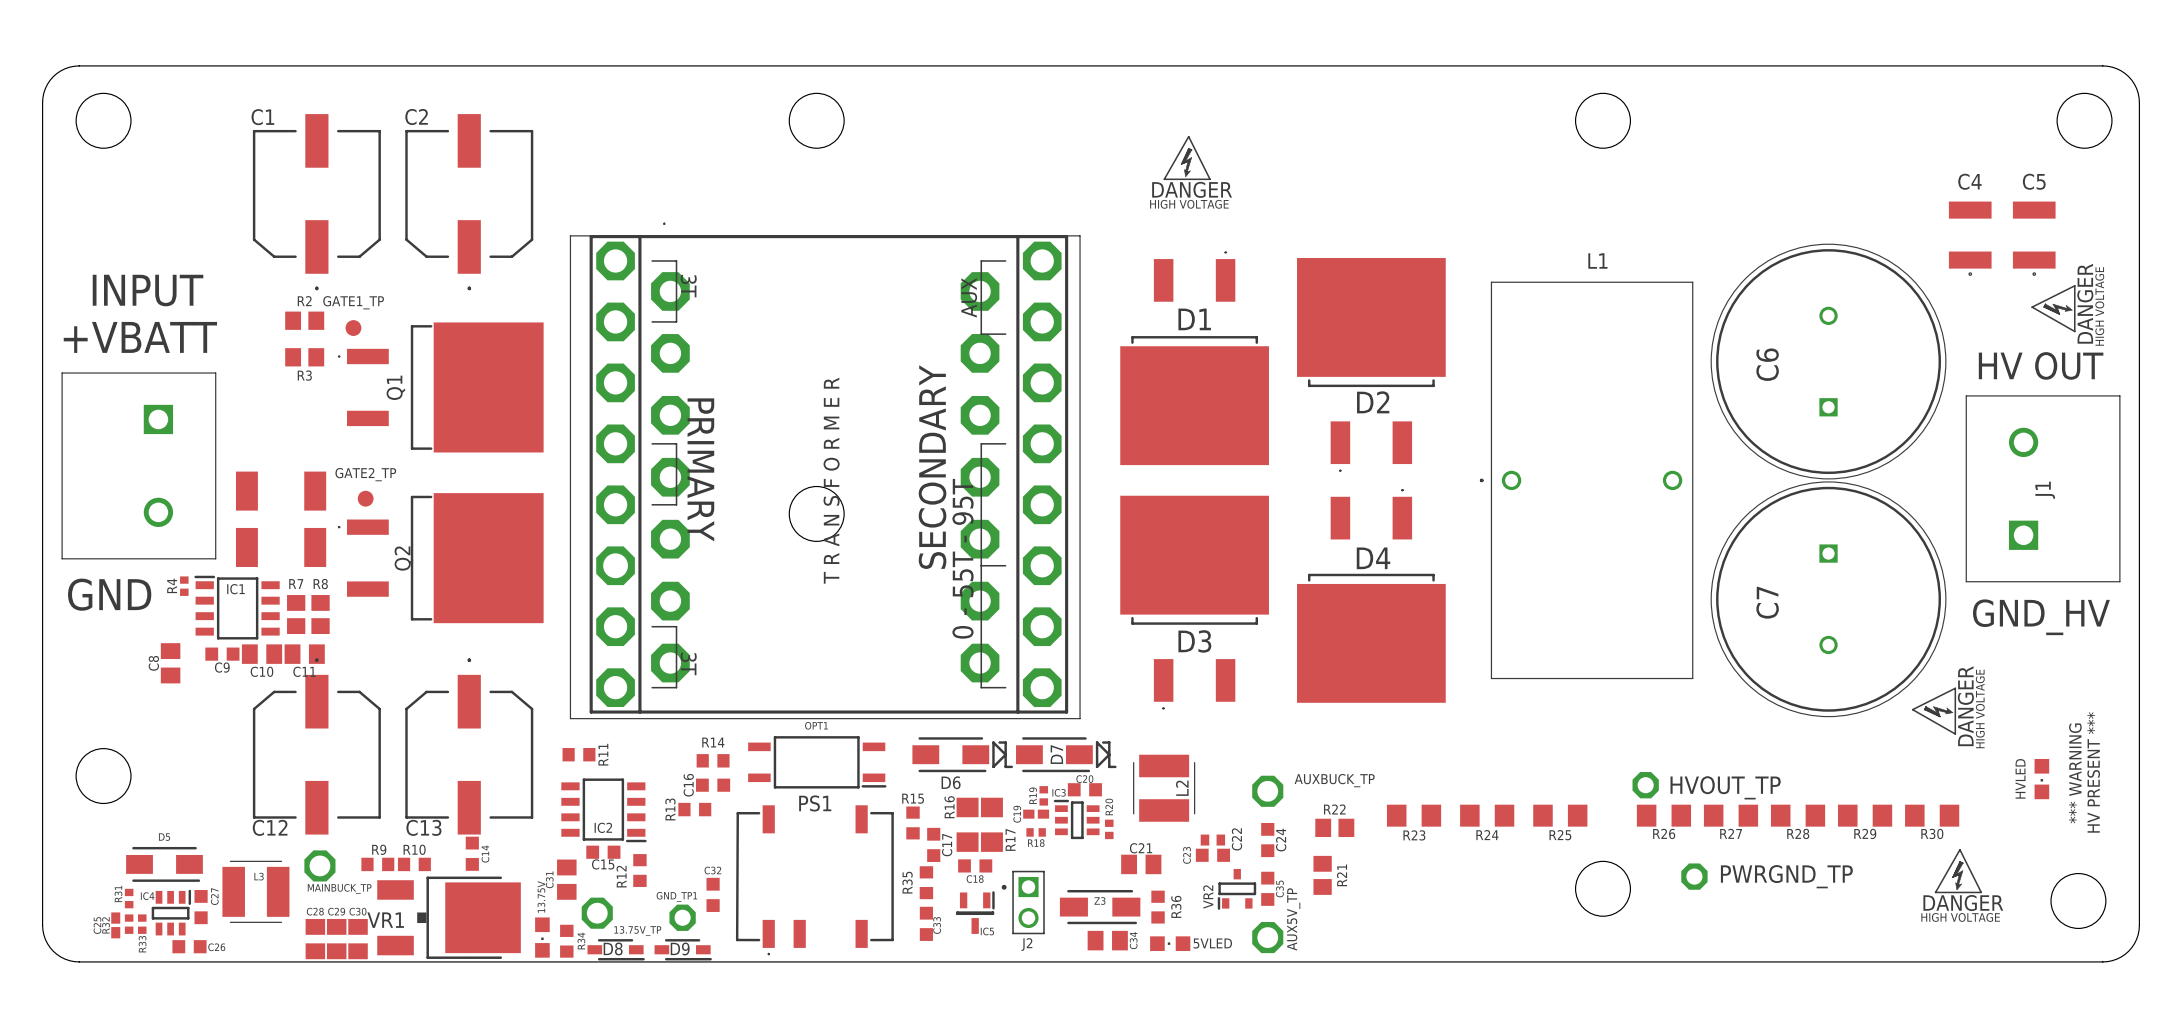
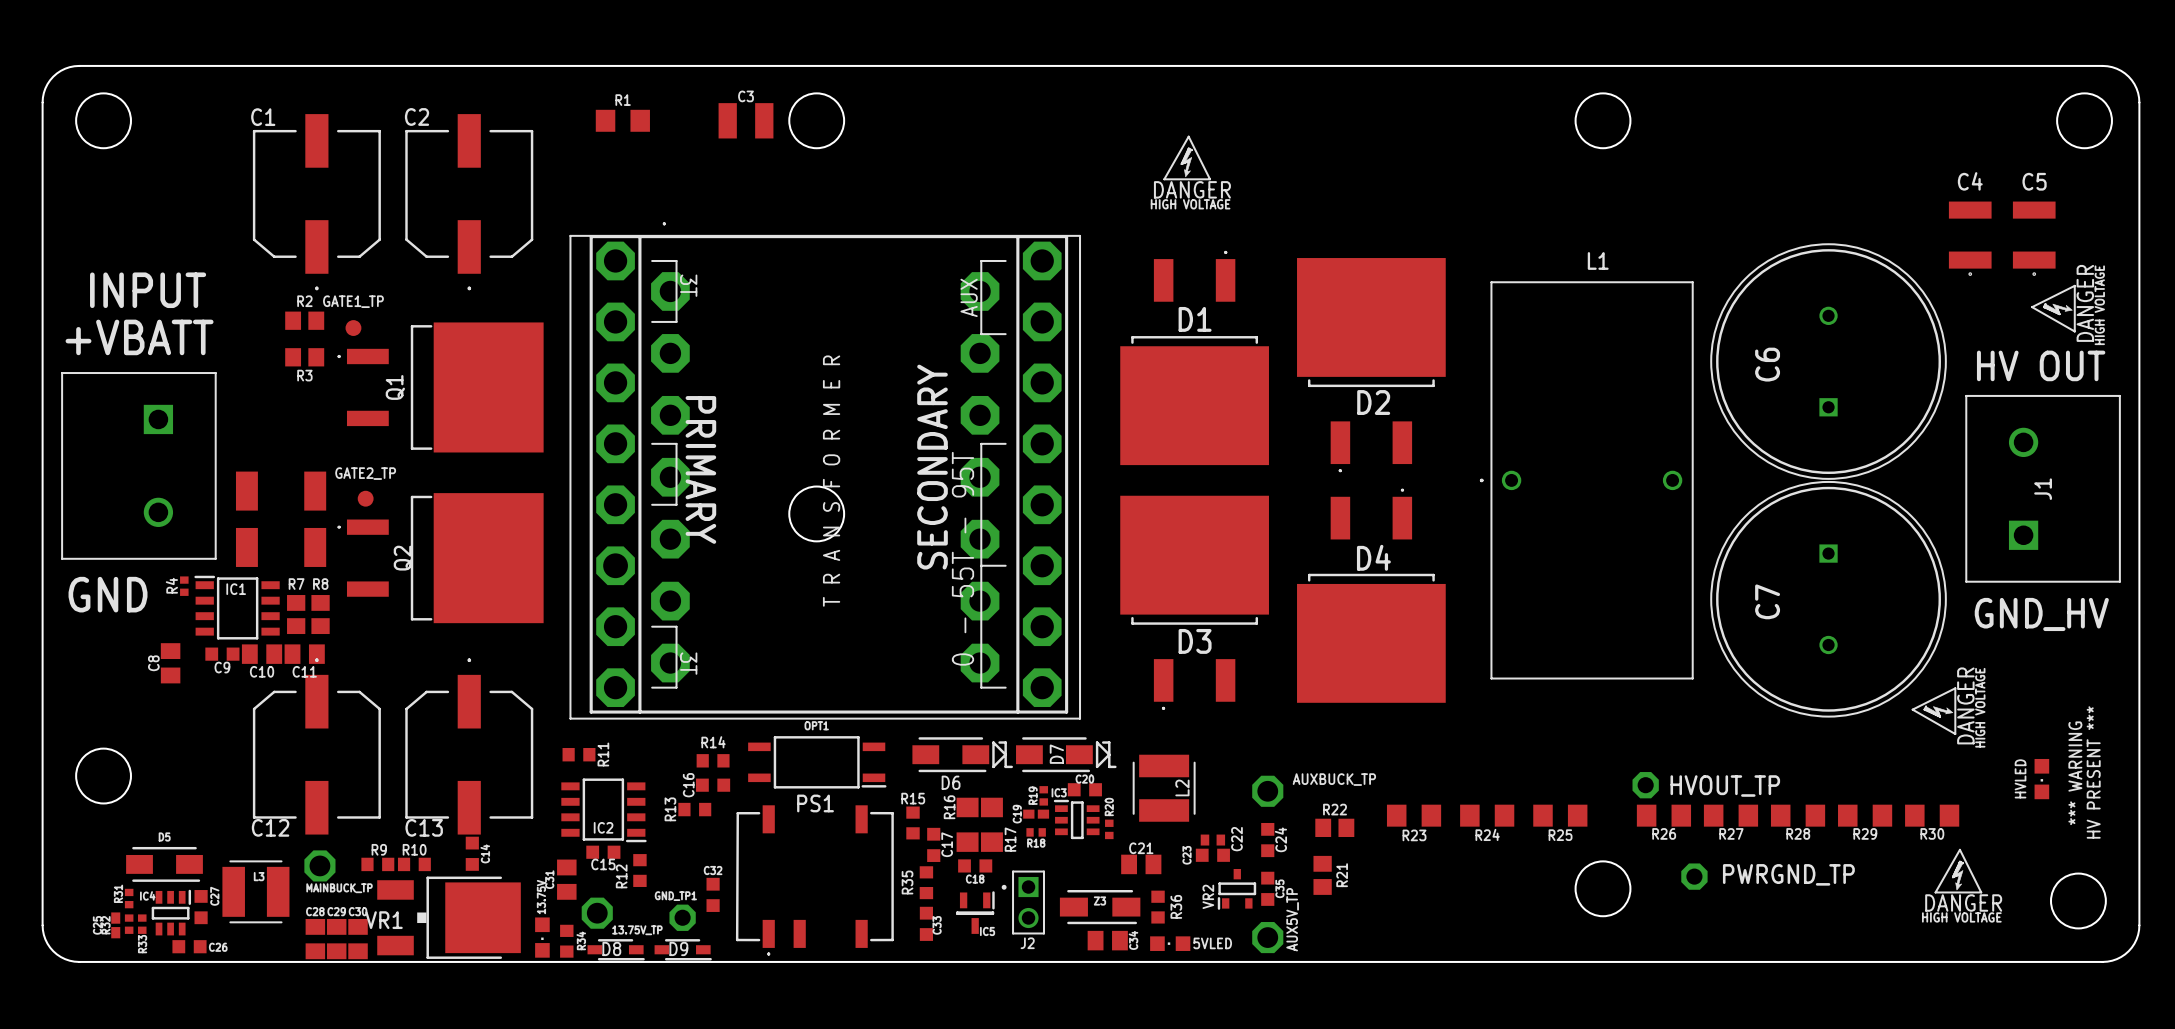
R1: none -> (622, 120)
C3: none -> (746, 120)

